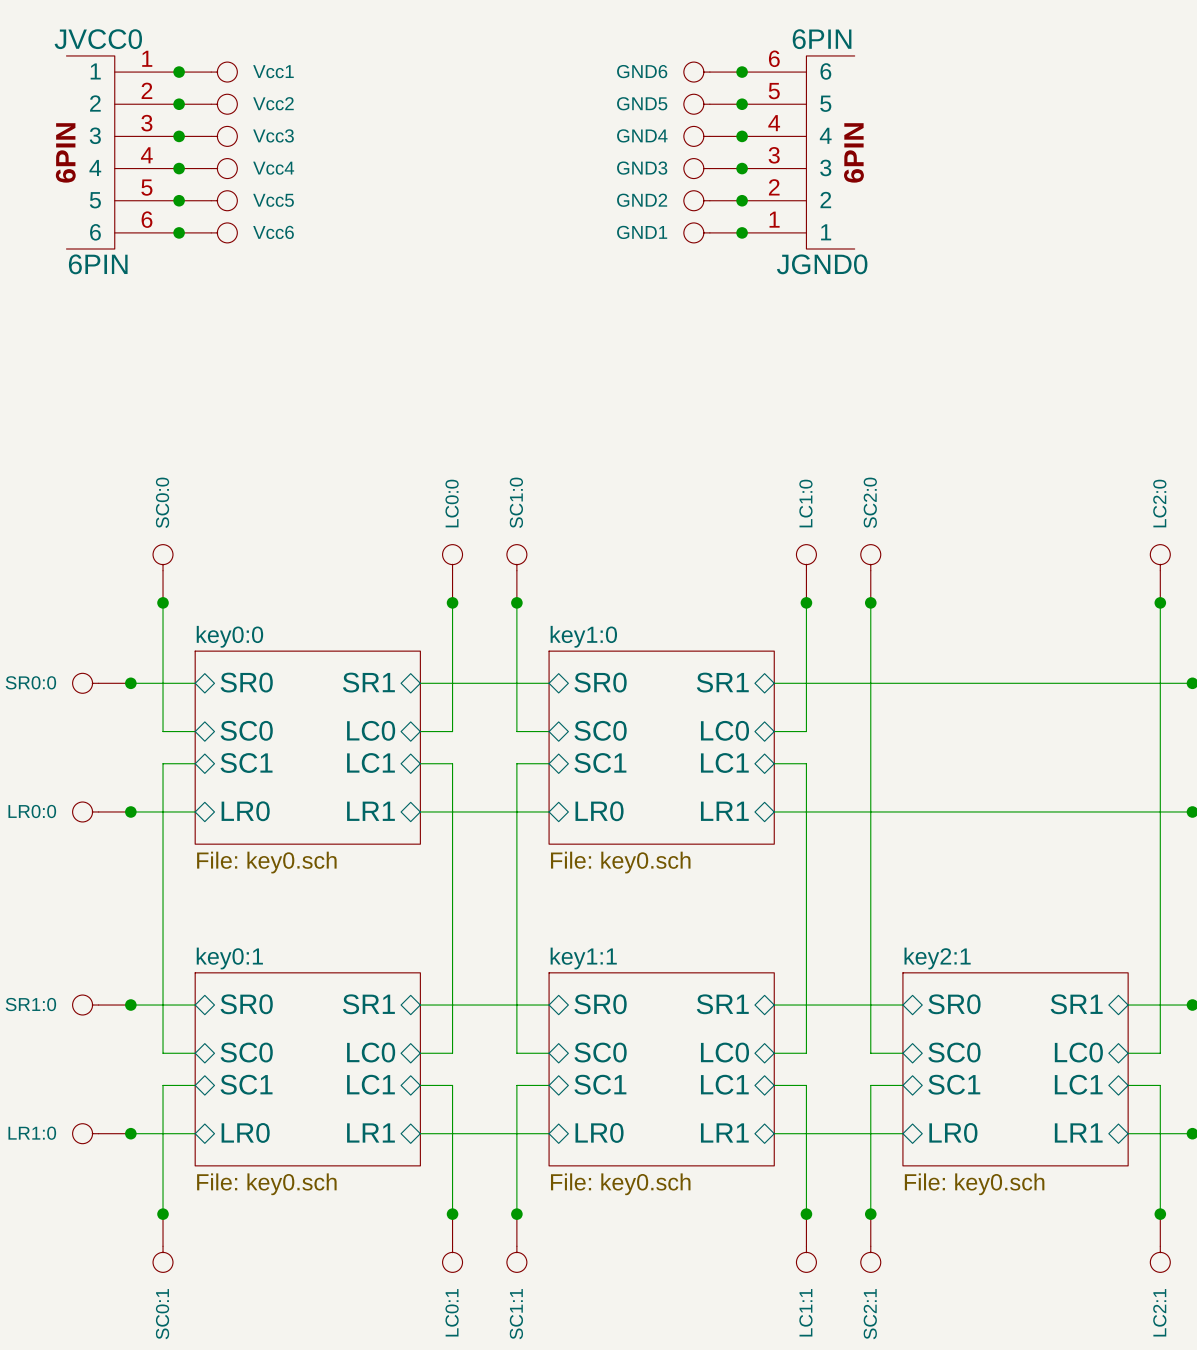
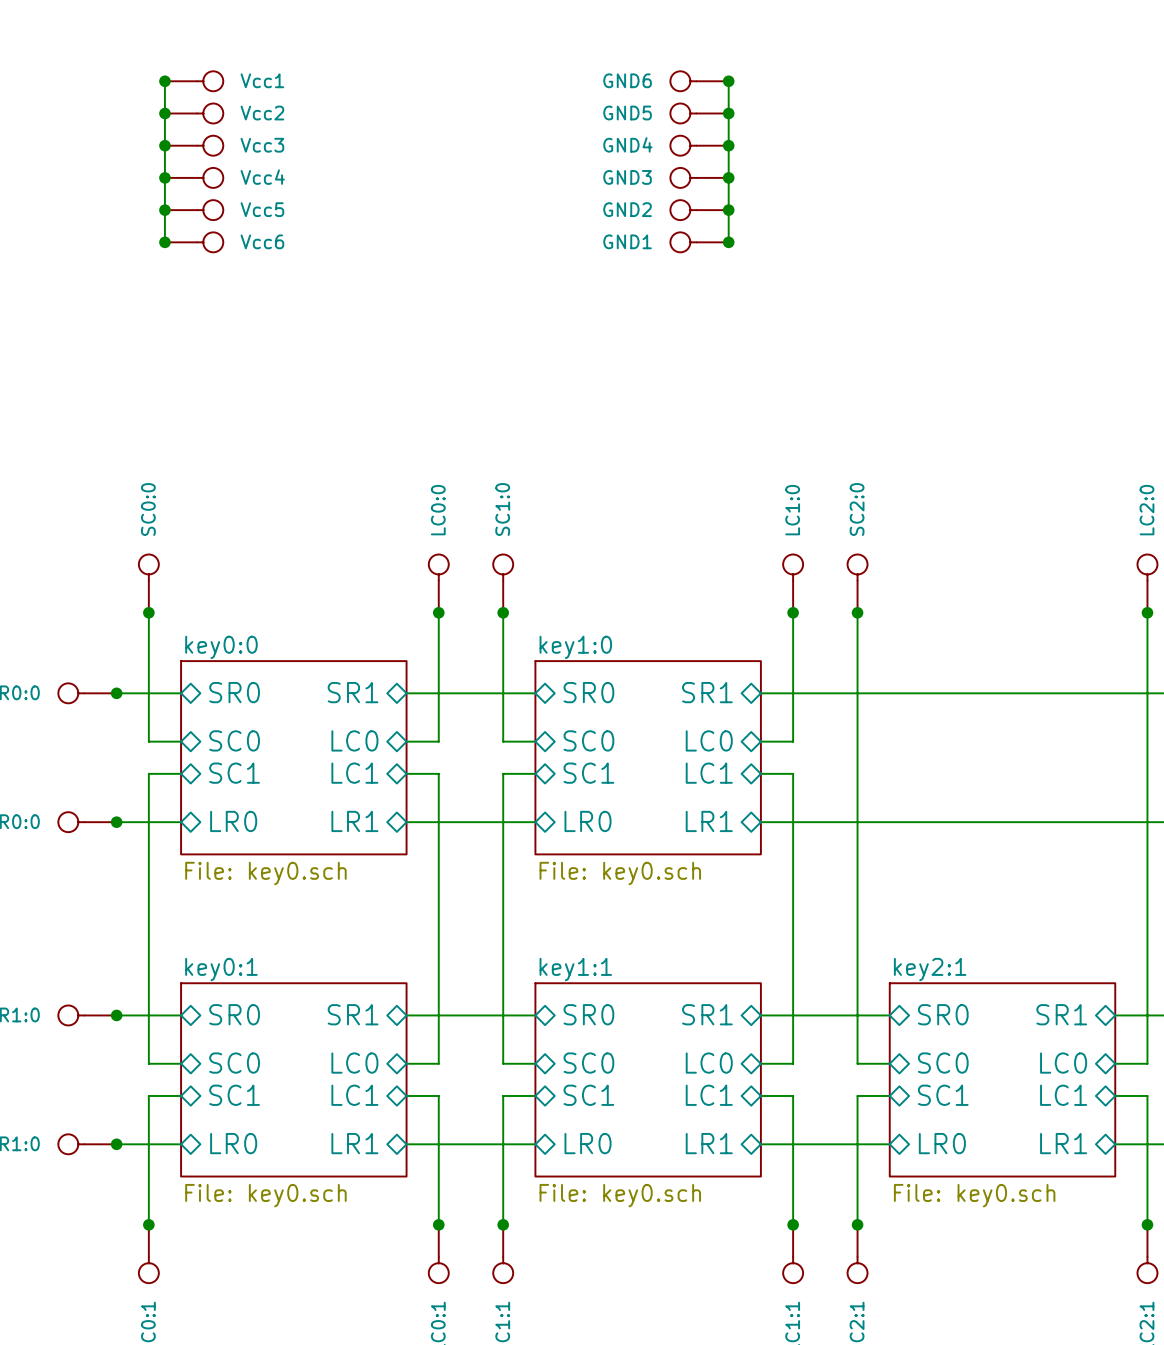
wire: none -> (164, 81) (164, 242)
wire: none -> (728, 81) (728, 242)
JVCC0: 6PIN (122, 152) -> none
JGND0: 6PIN (798, 152) -> none

